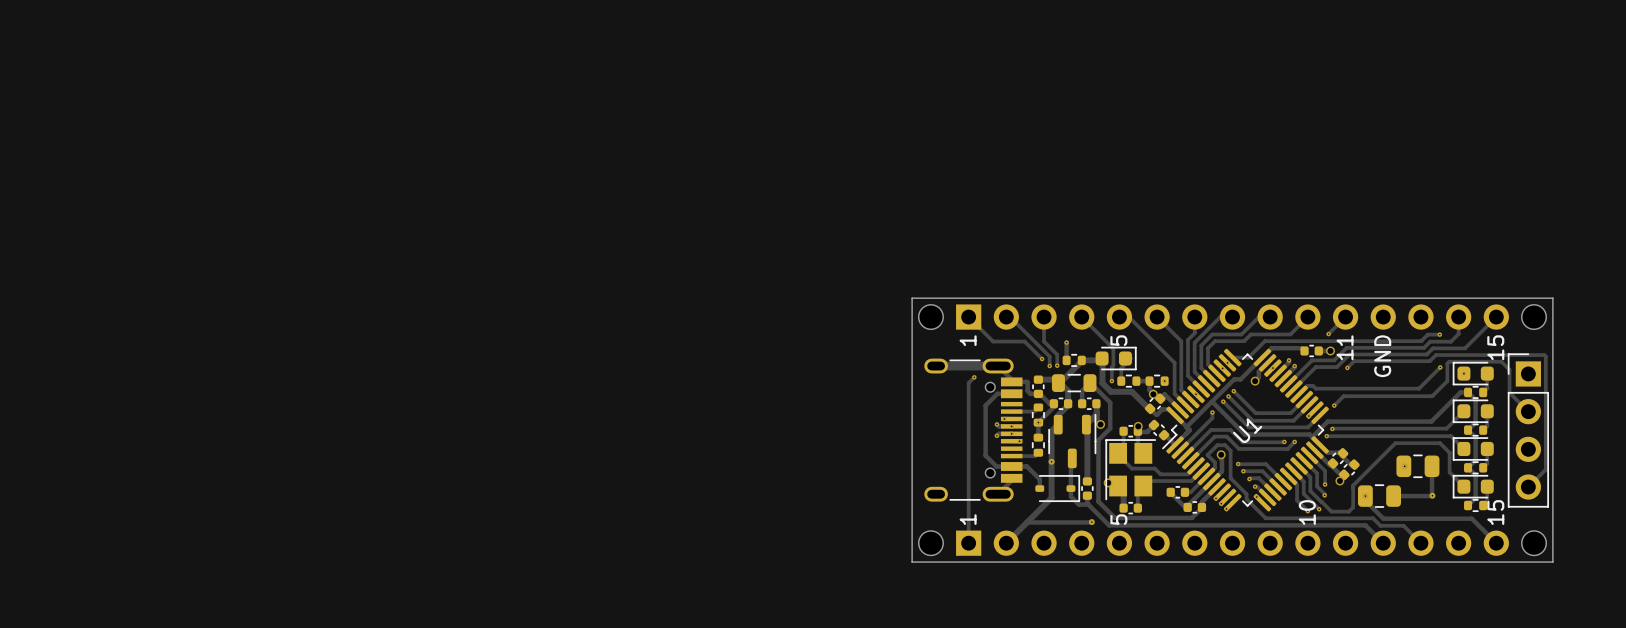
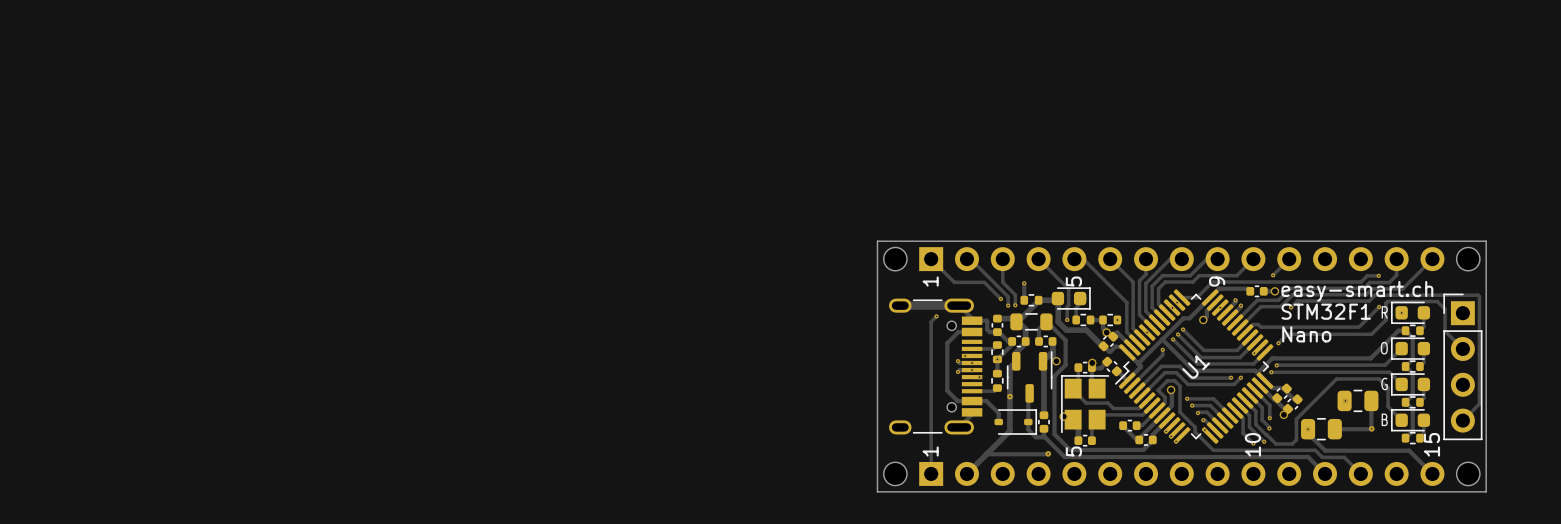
text: none -> 9 (1217, 281)
text: 11 (1345, 347) -> none
text: 15 (1495, 347) -> none
text: none -> easy-smart.ch (1357, 291)
text: GND (1382, 356) -> none
text: none -> STM32F1 (1326, 311)
text: none -> R (1384, 312)
text: none -> Nano (1306, 334)
text: none -> O (1384, 348)
text: none -> G (1384, 384)
text: none -> B (1384, 419)

